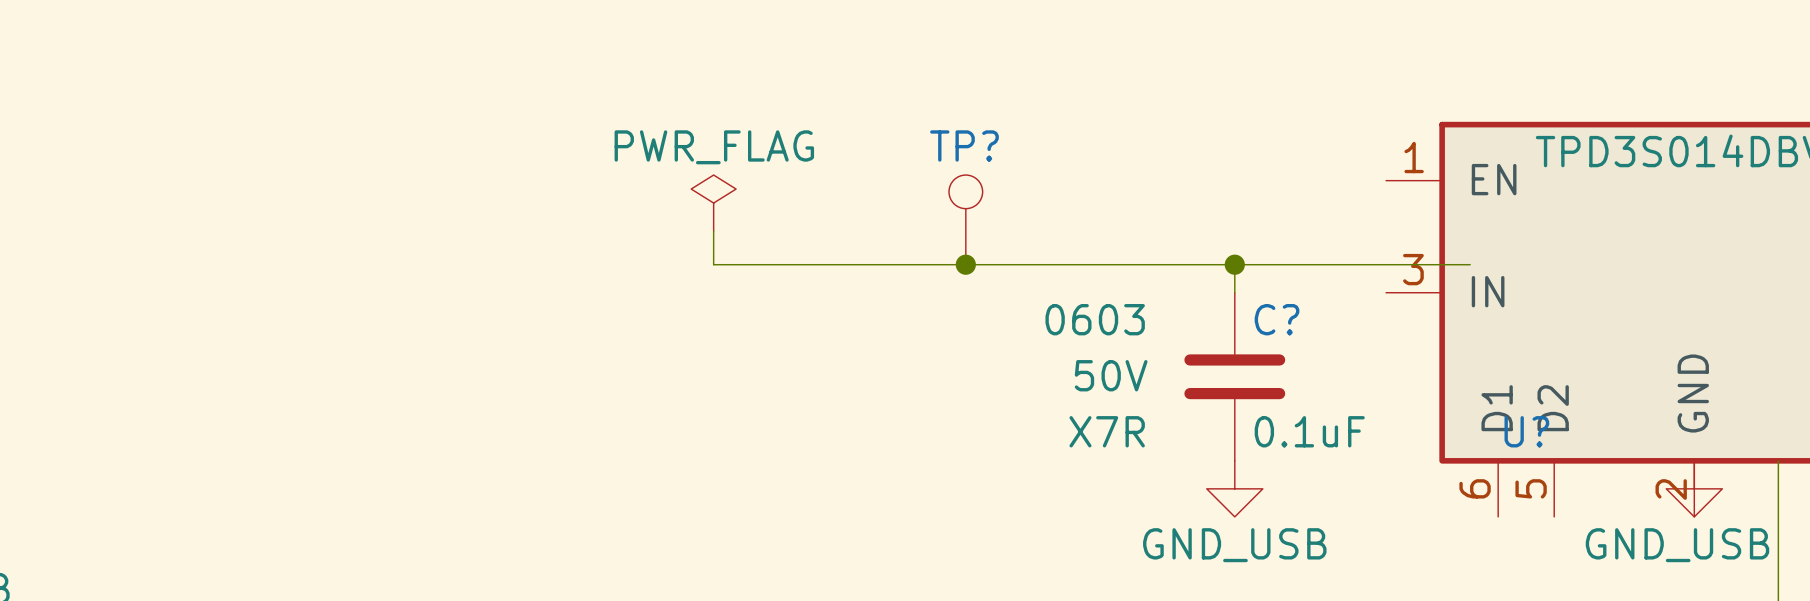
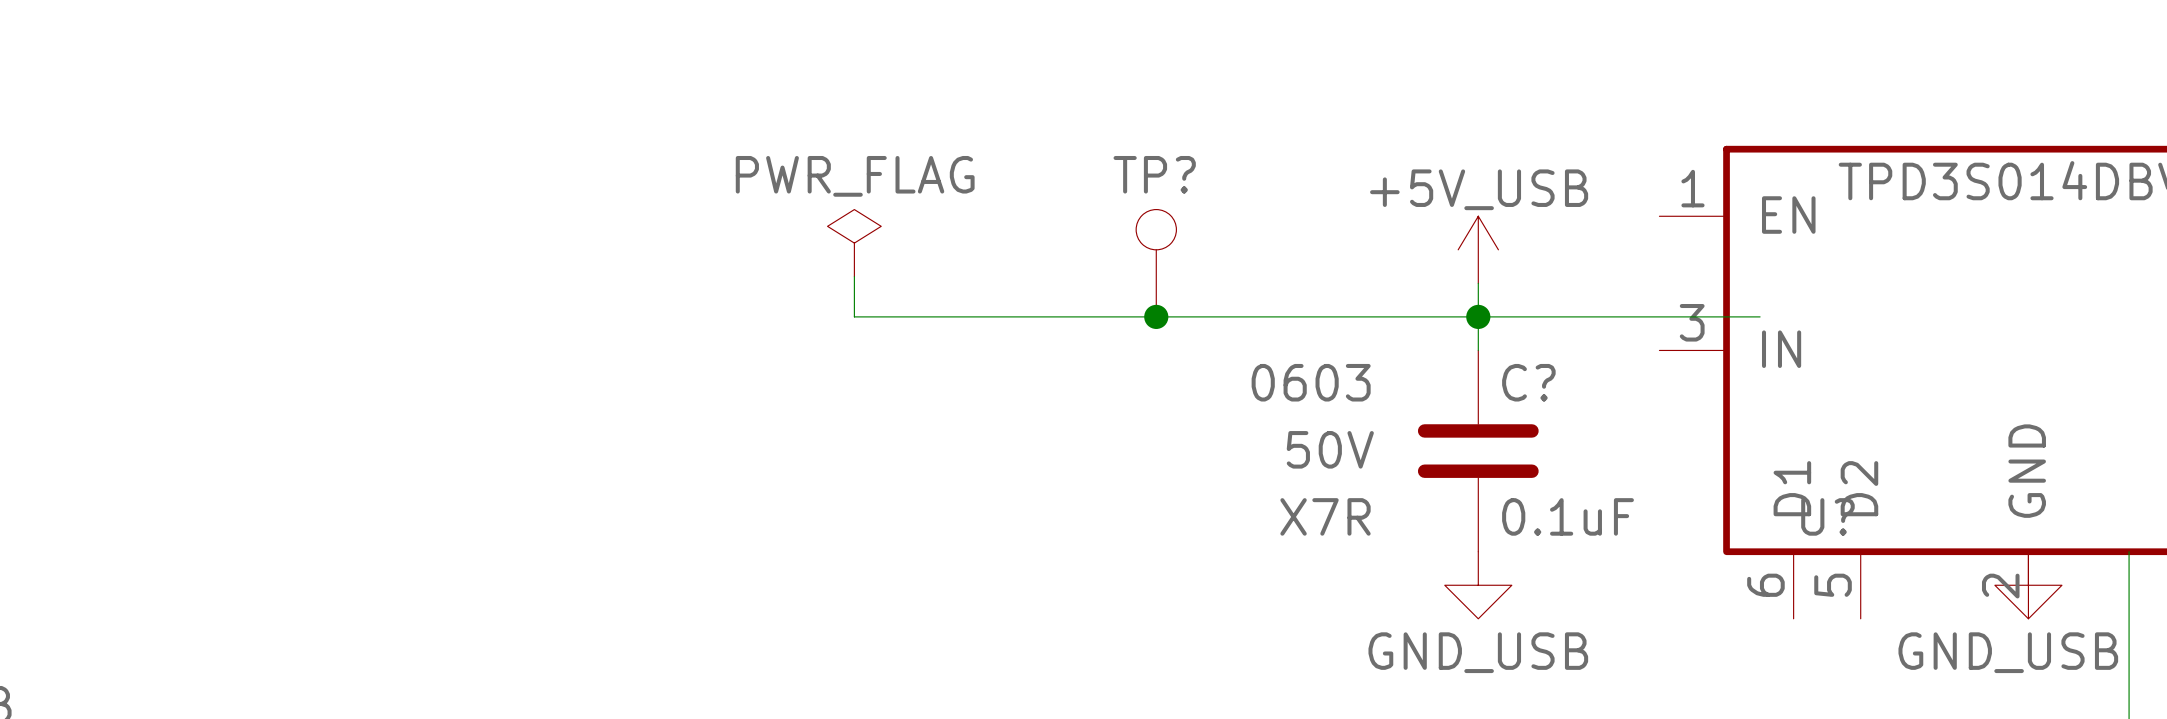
power symbol: none -> +5V_USB (1478, 249)
wire: none -> (1478, 283) (1478, 316)

